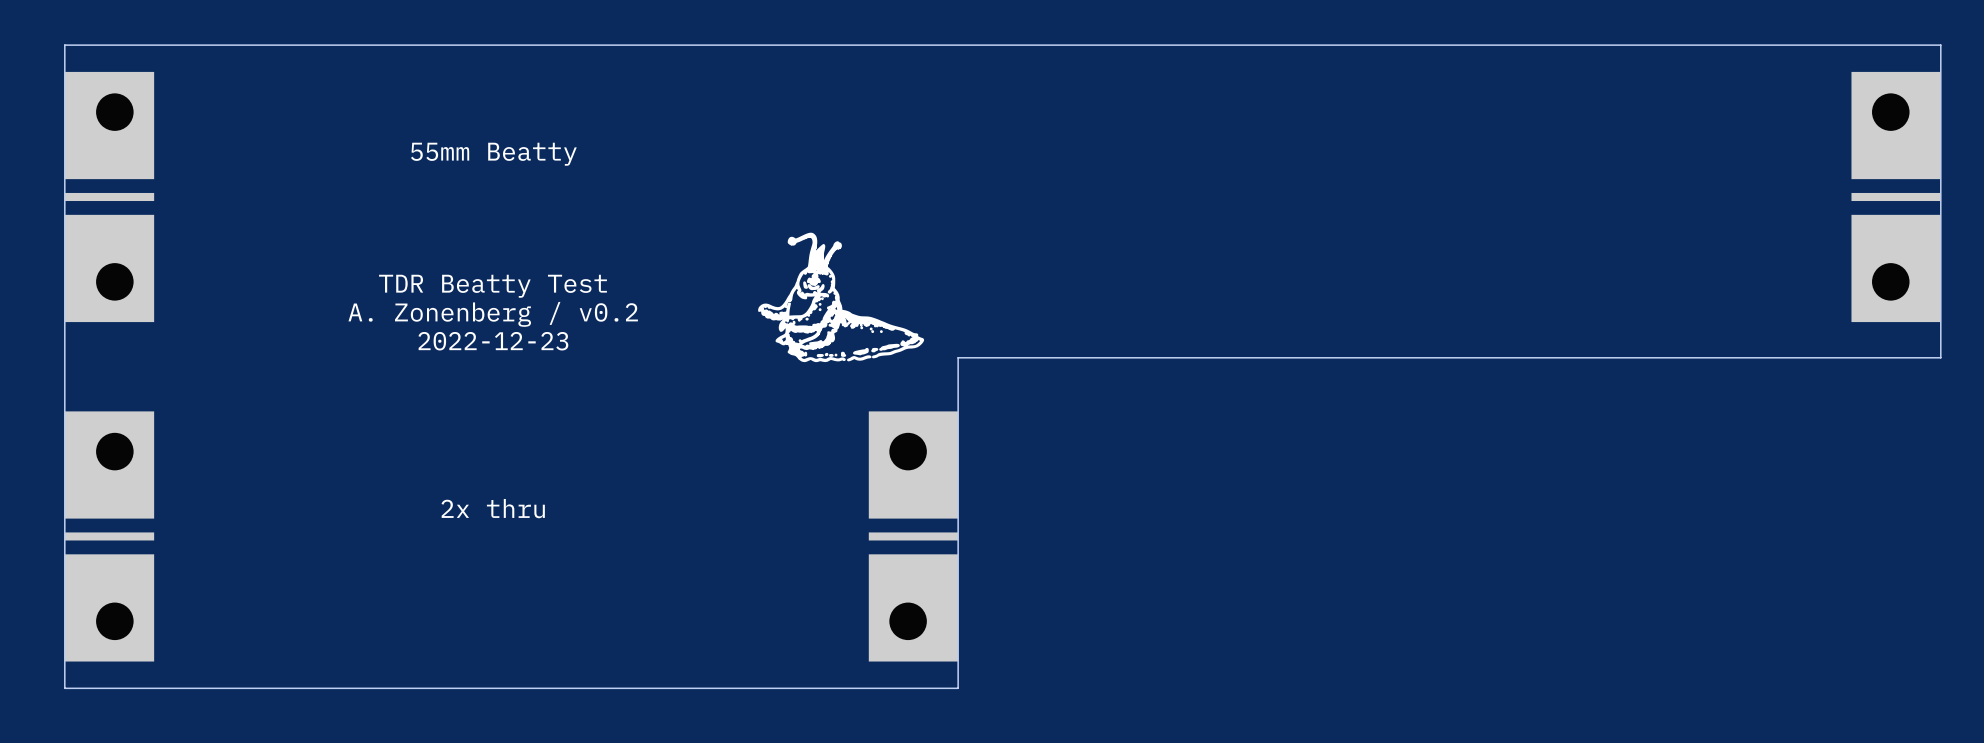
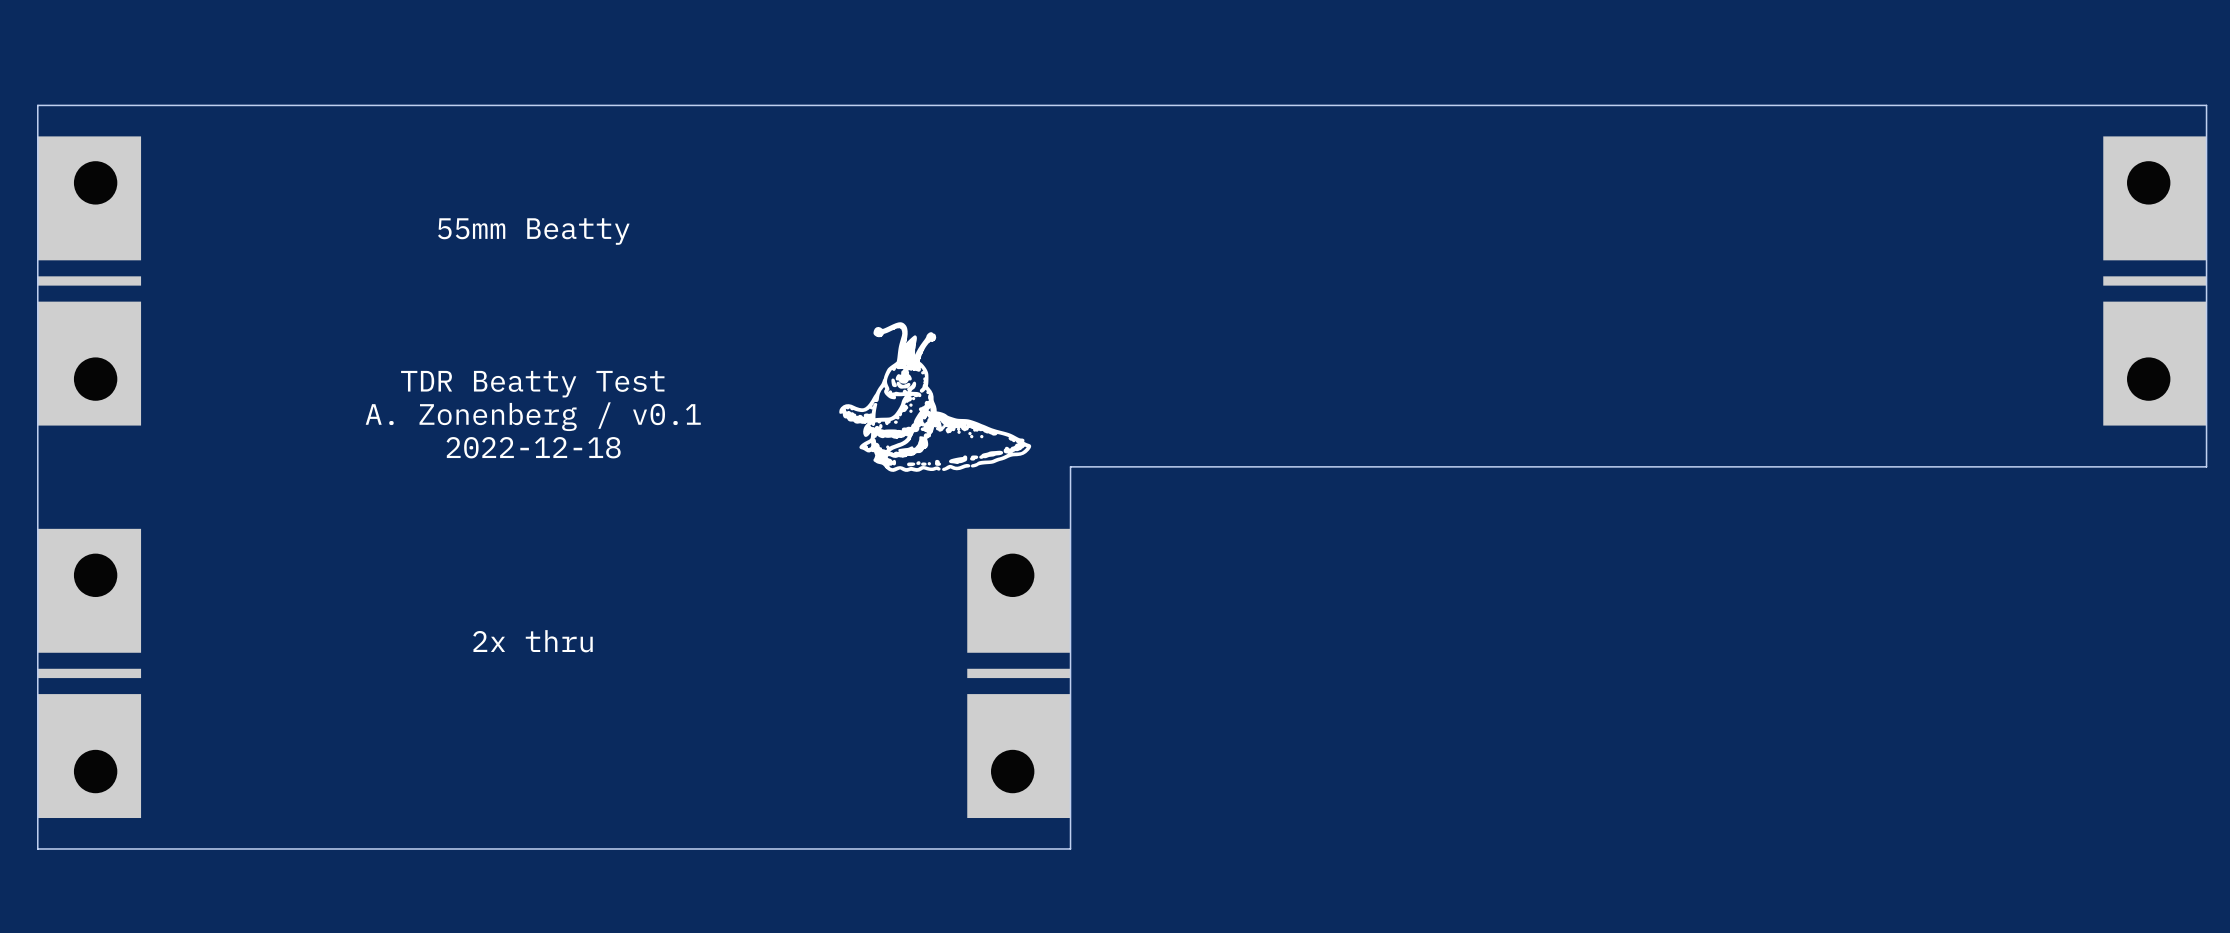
text: A. Zonenberg / v0.2 (493, 314) -> A. Zonenberg / v0.1 (533, 416)
text: 2022-12-23 (493, 341) -> 2022-12-18 (533, 447)

